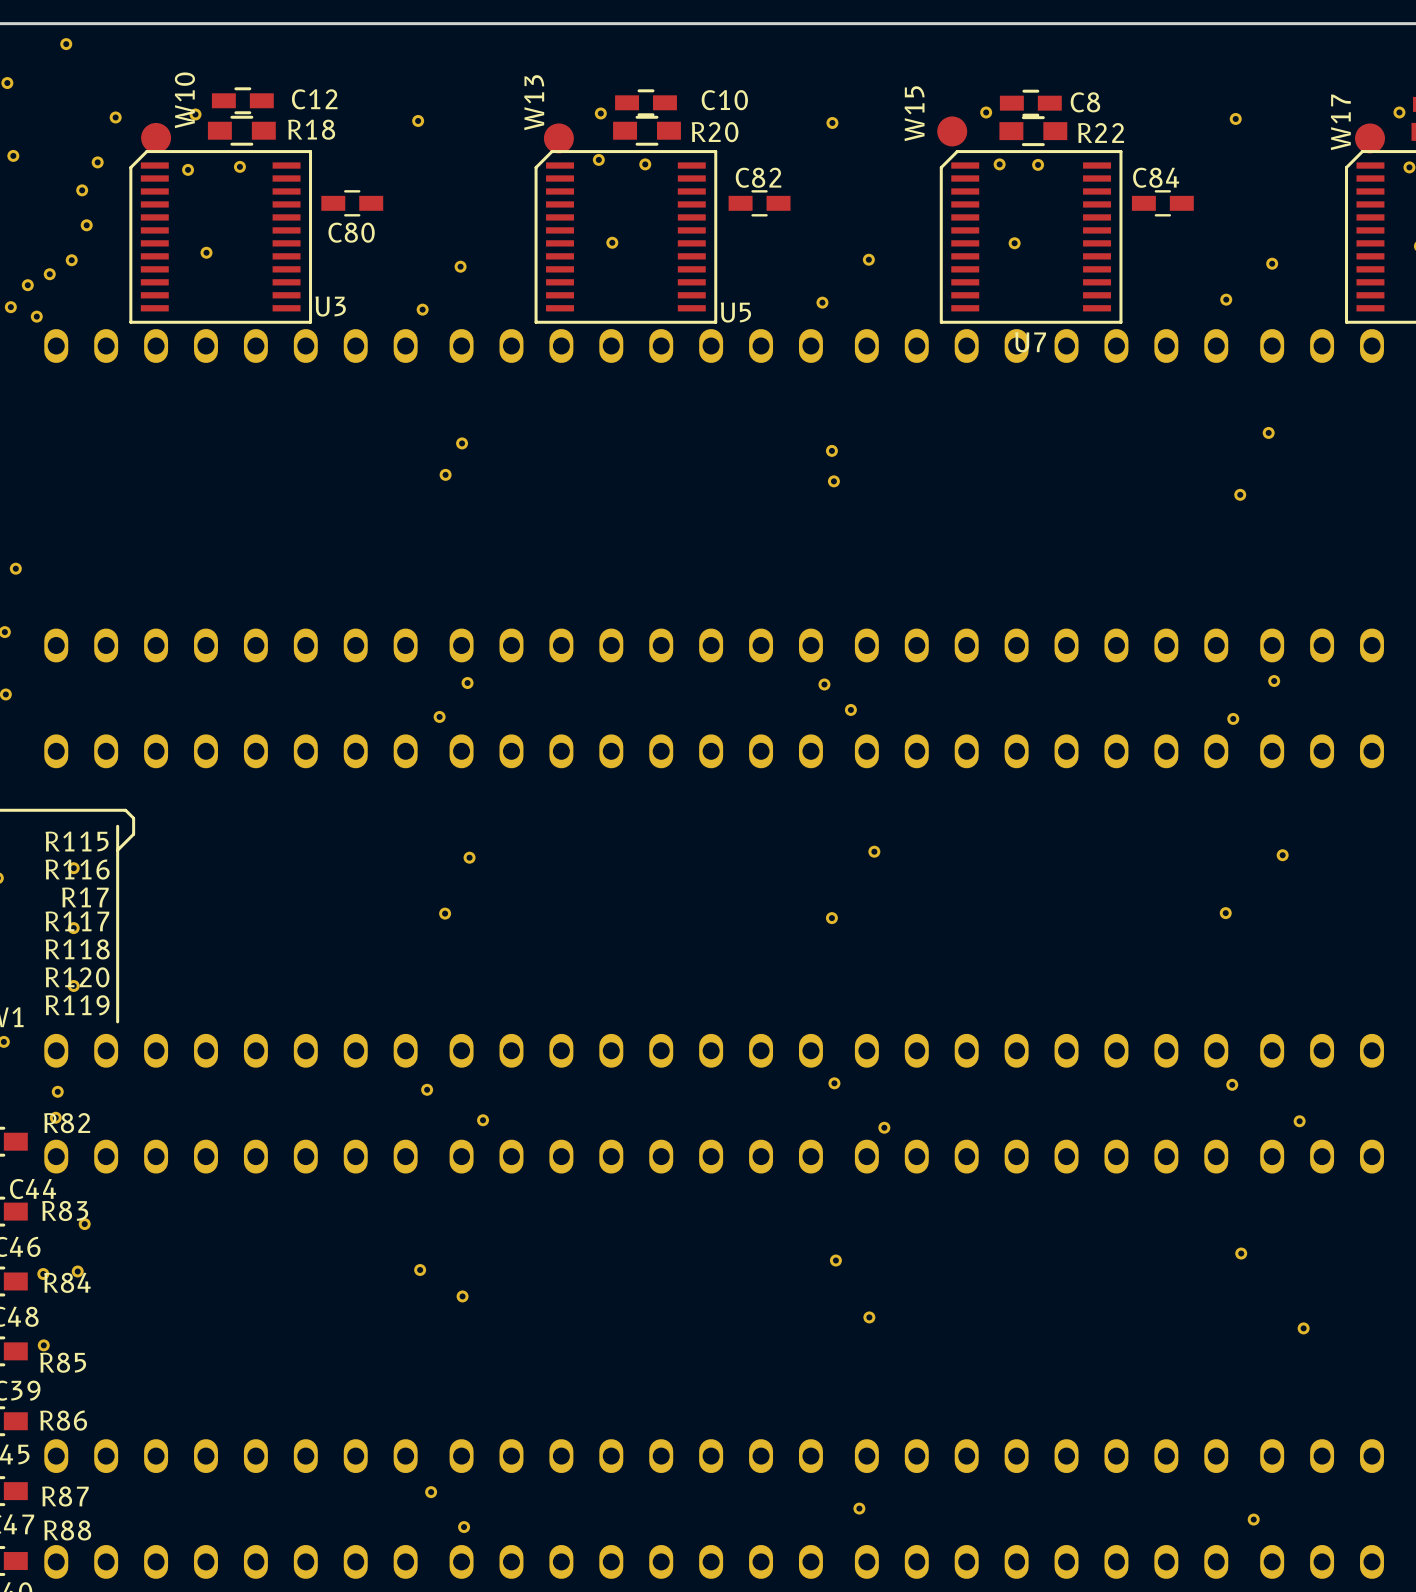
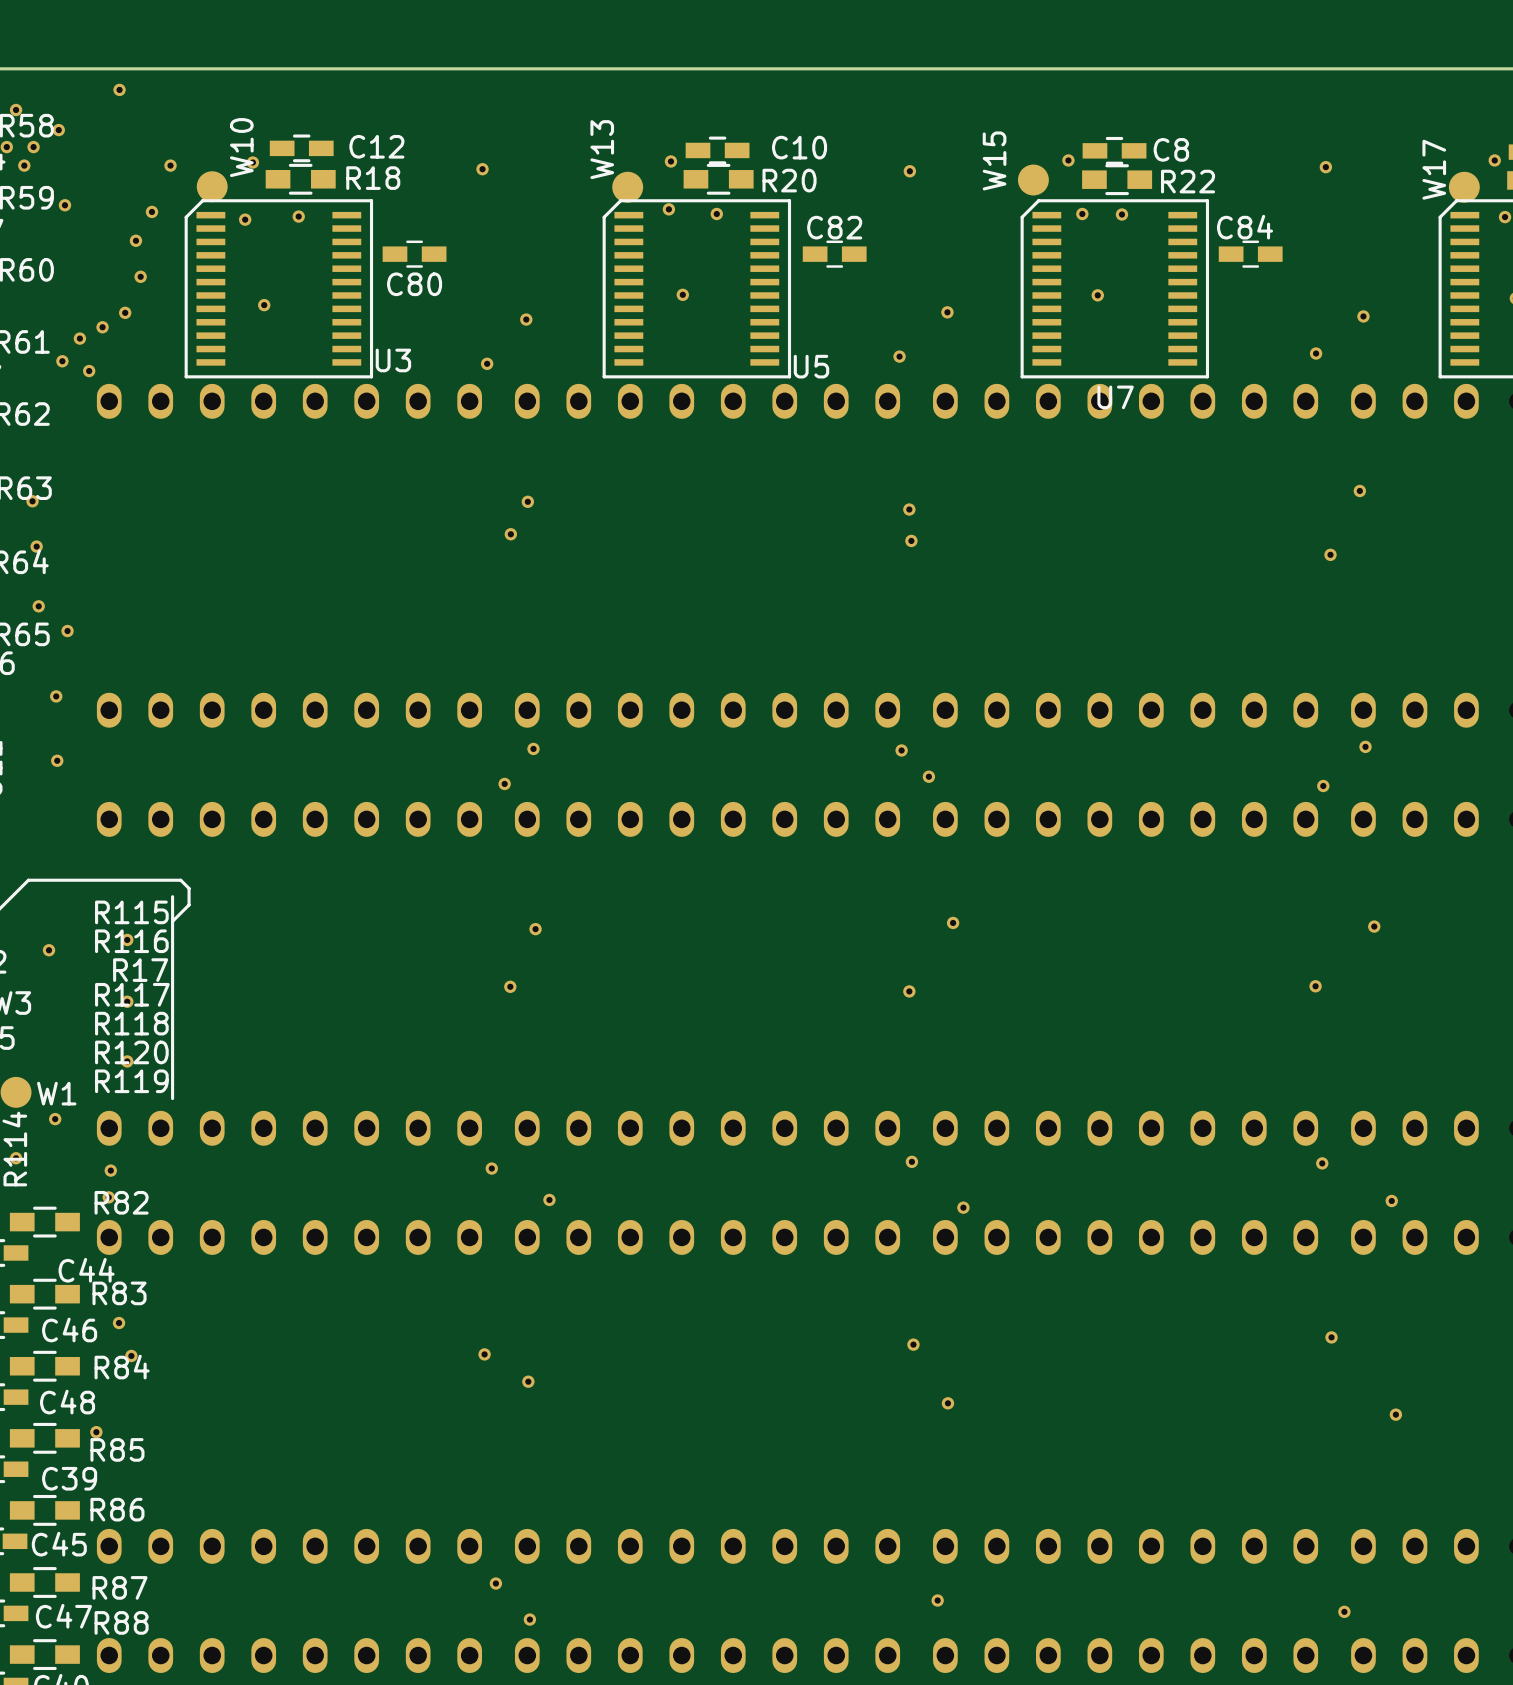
part: (84, 1224) -> none
part: none -> (119, 1323)
part: (43, 1273) -> none

